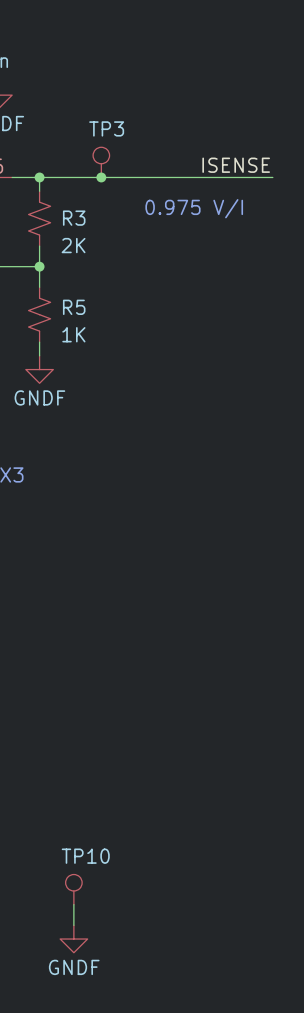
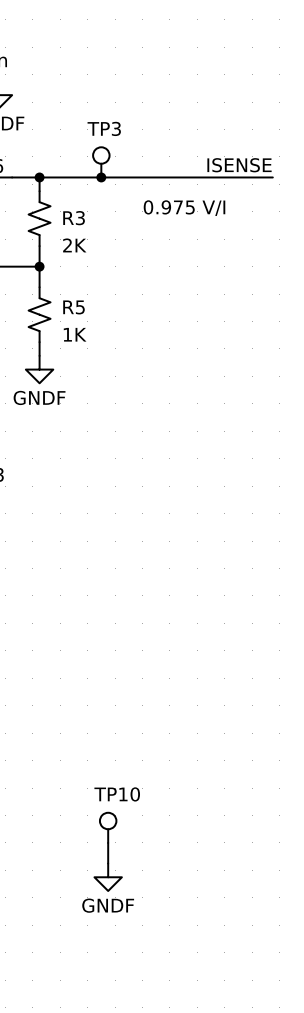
TP10 position: (73, 889) -> (108, 827)
wire: (73, 904) (73, 925) -> (108, 842) (108, 863)
power symbol position: GNDF (73, 939) -> GNDF (108, 877)

